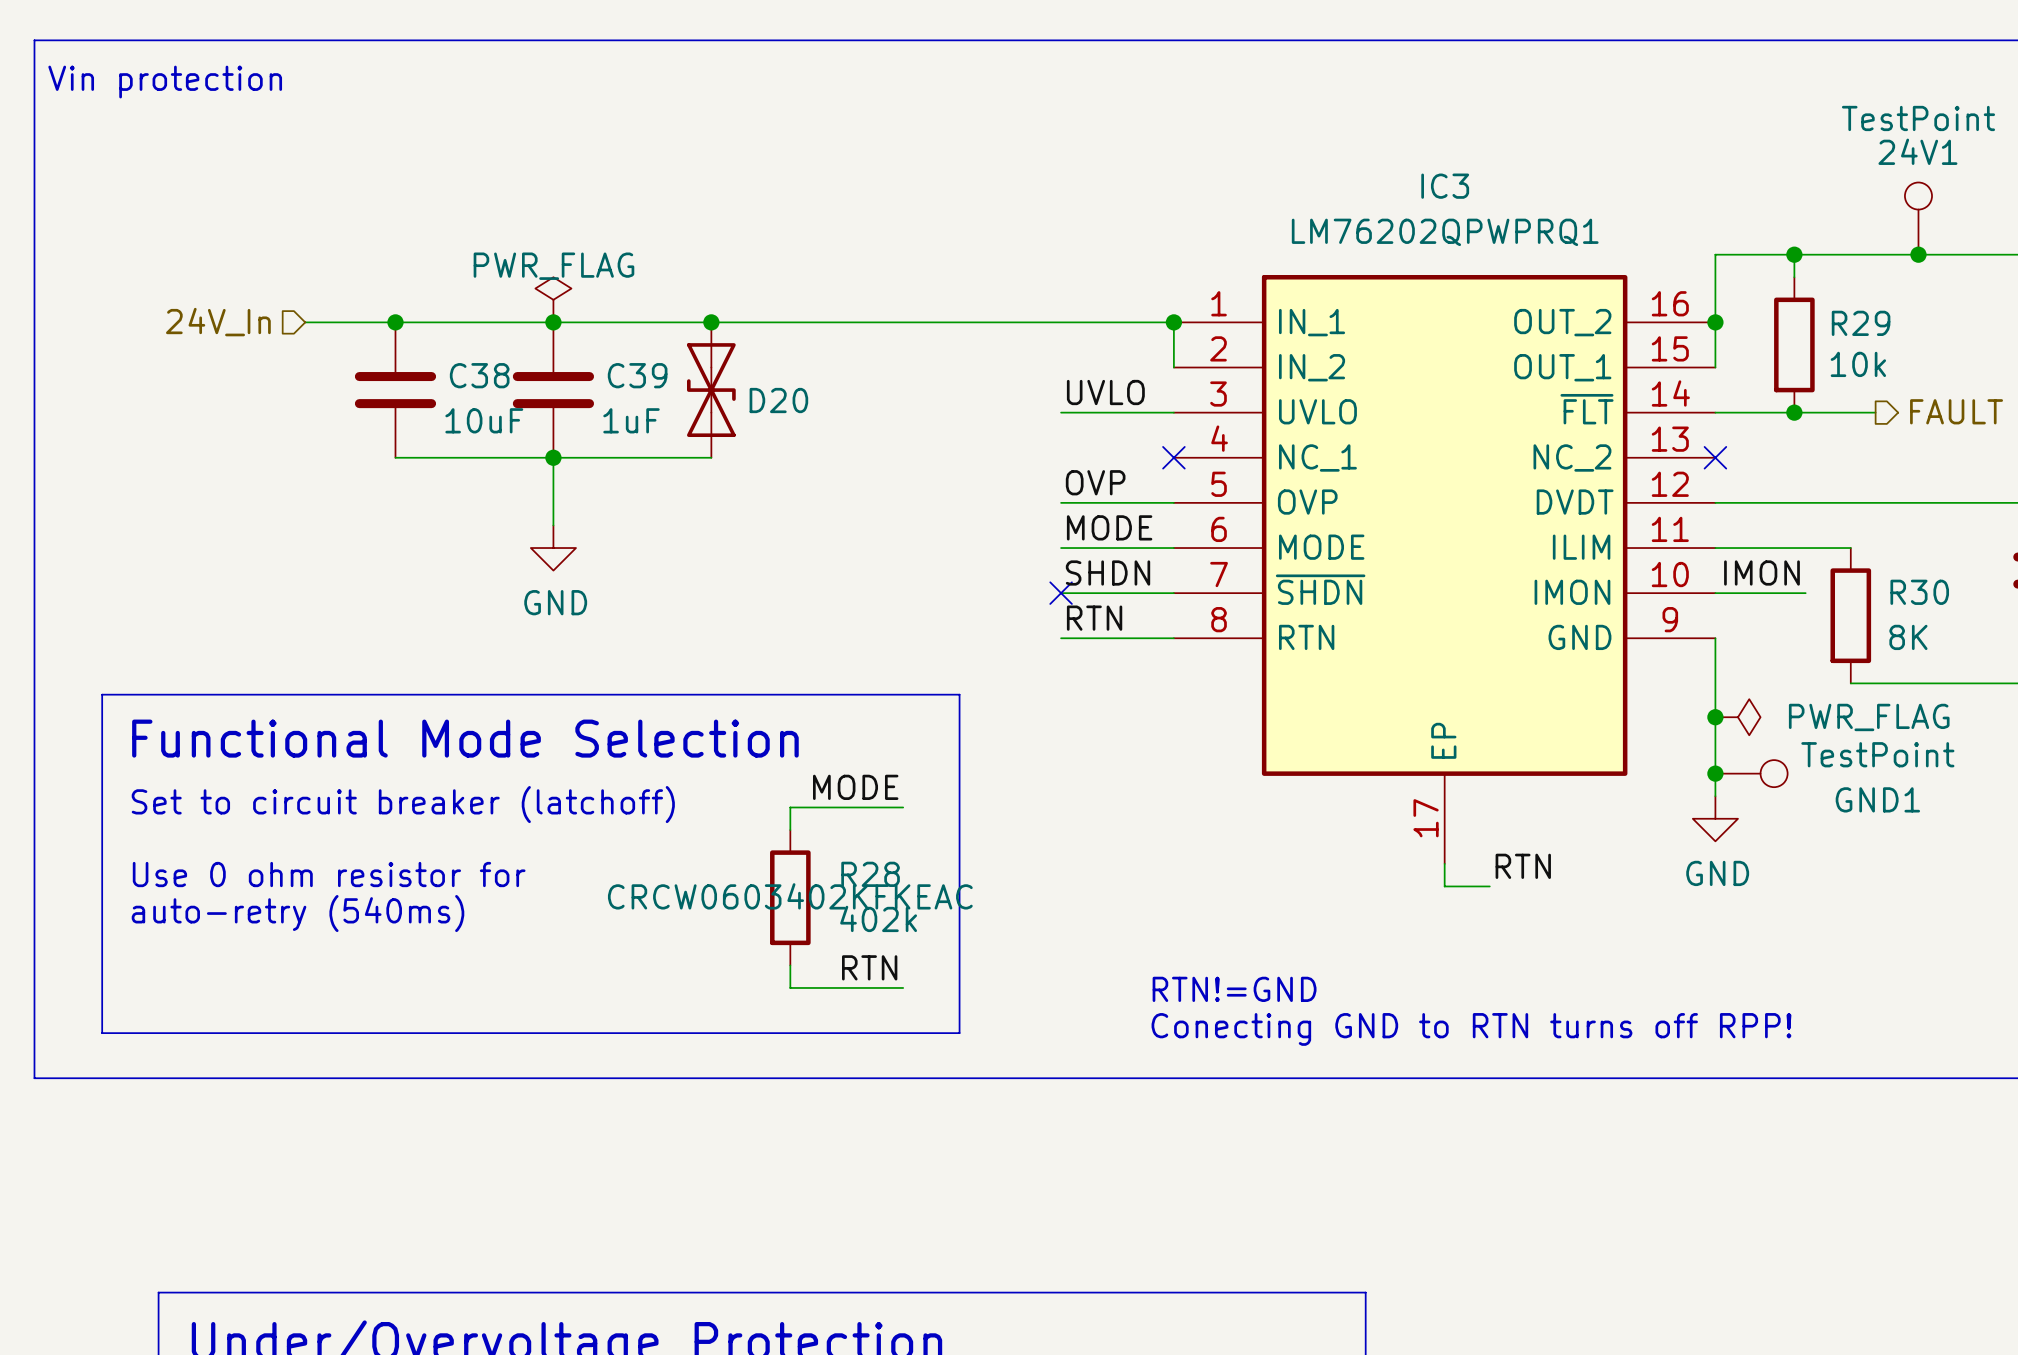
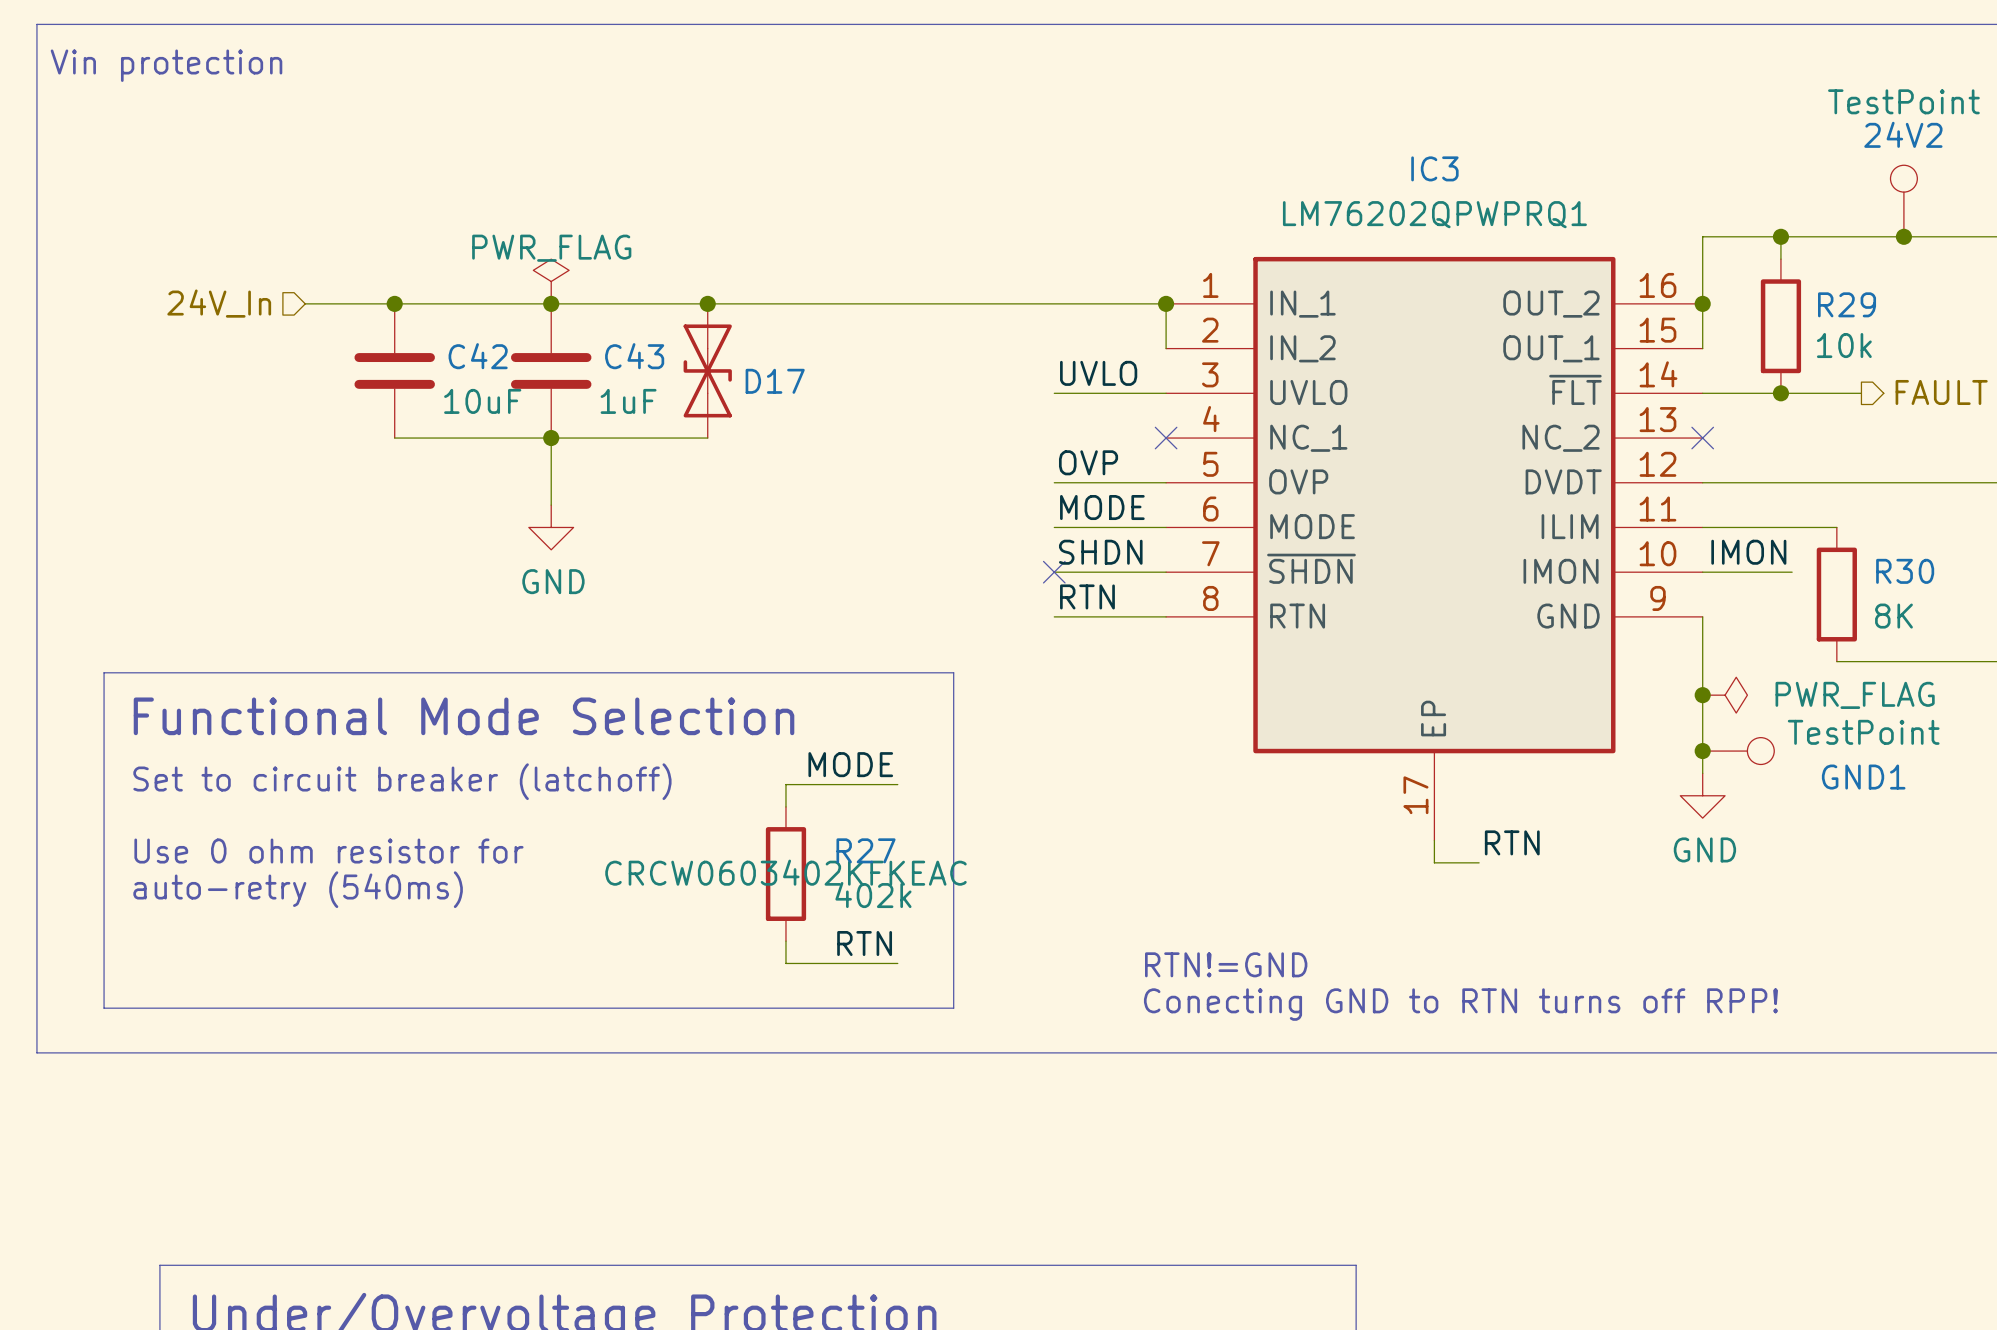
24V1 name: 24V1 (1917, 151) -> 24V2 (1903, 134)
C38 name: C38 (479, 375) -> C42 (478, 356)
C39 name: C39 (637, 375) -> C43 (634, 356)
D20 name: D20 (778, 400) -> D17 (775, 381)
R28 name: R28 (870, 874) -> R27 (866, 850)

